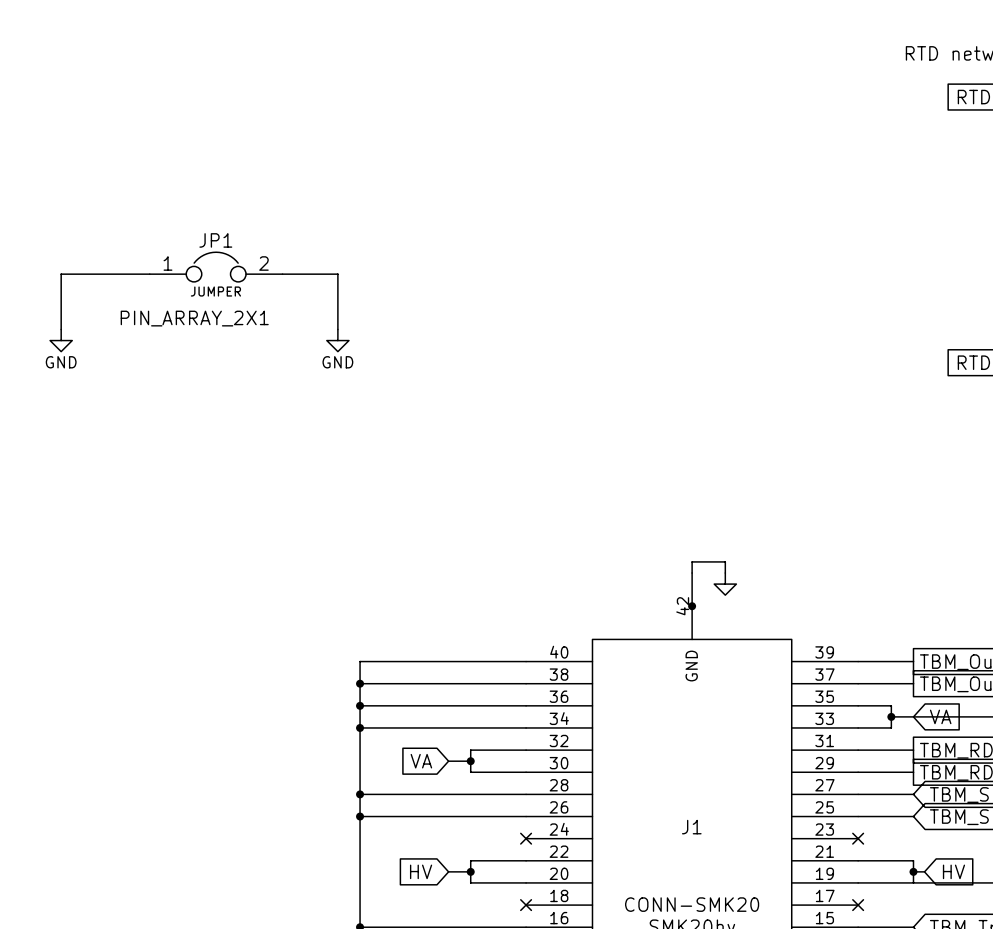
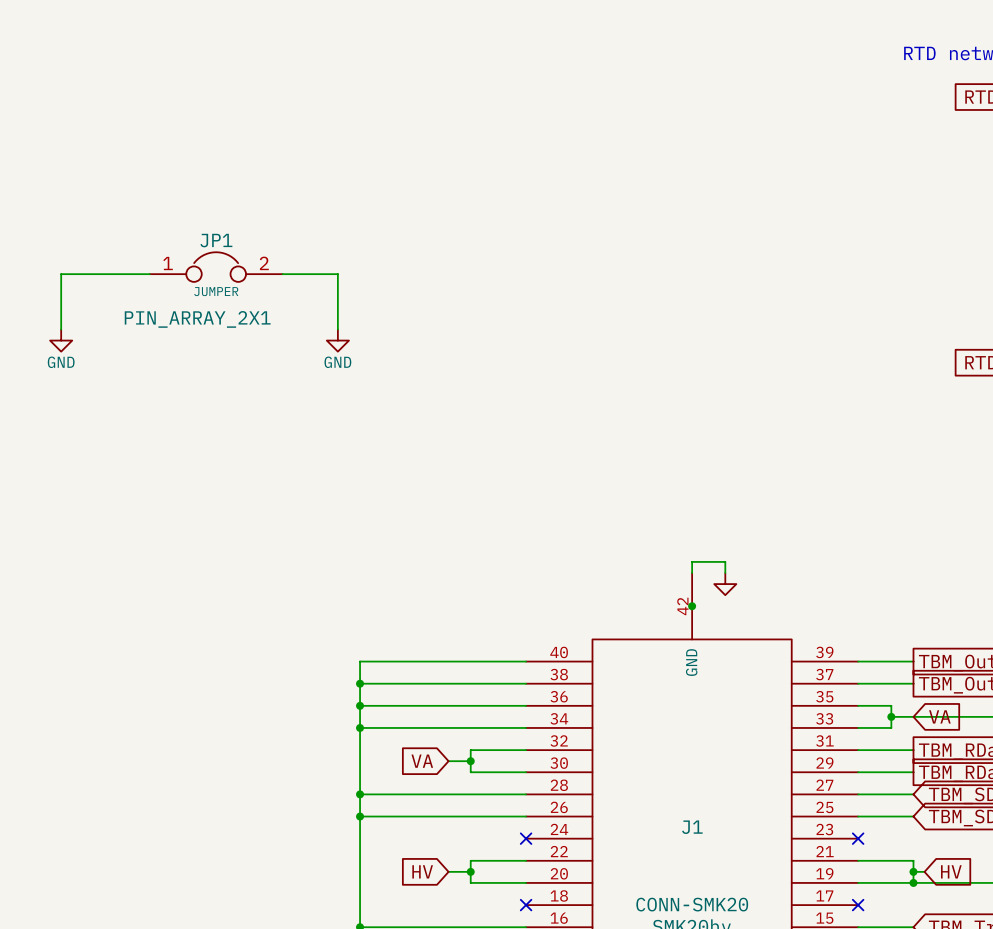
junction: none -> (913, 882)

